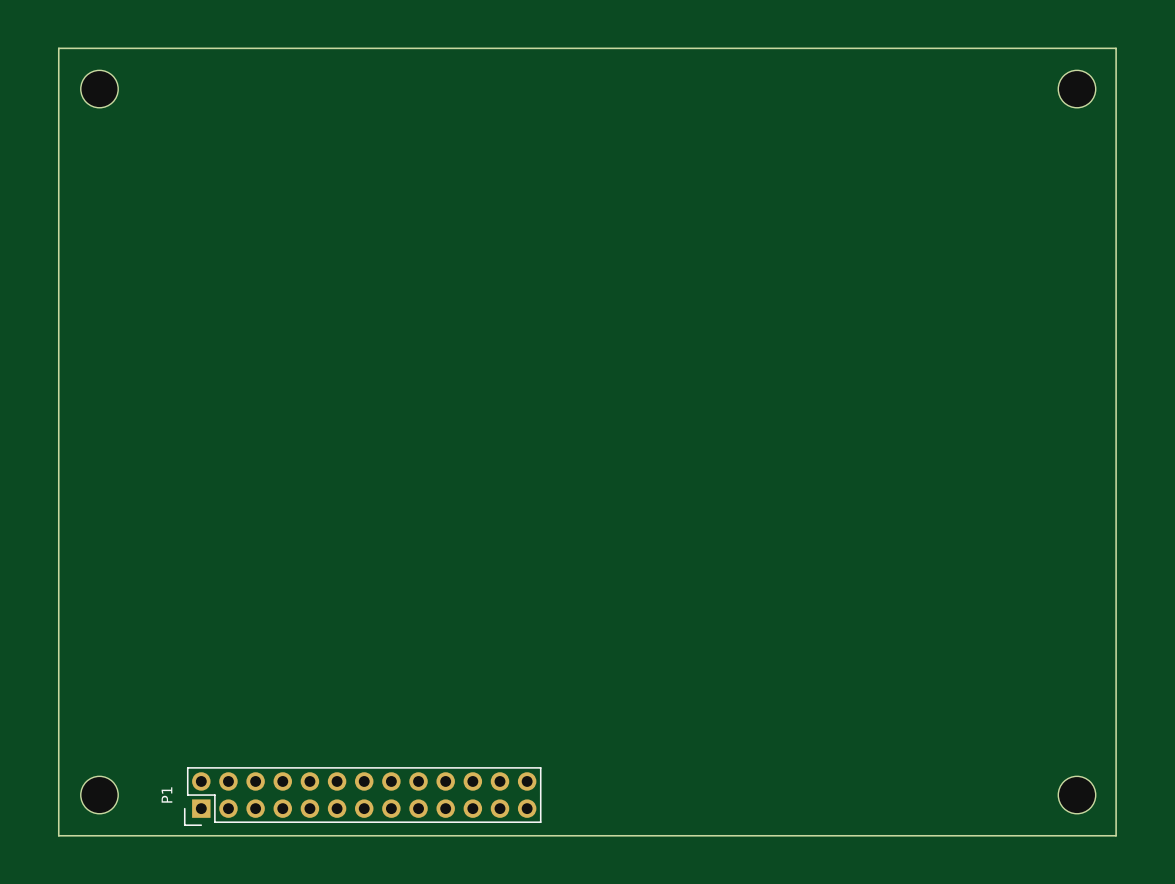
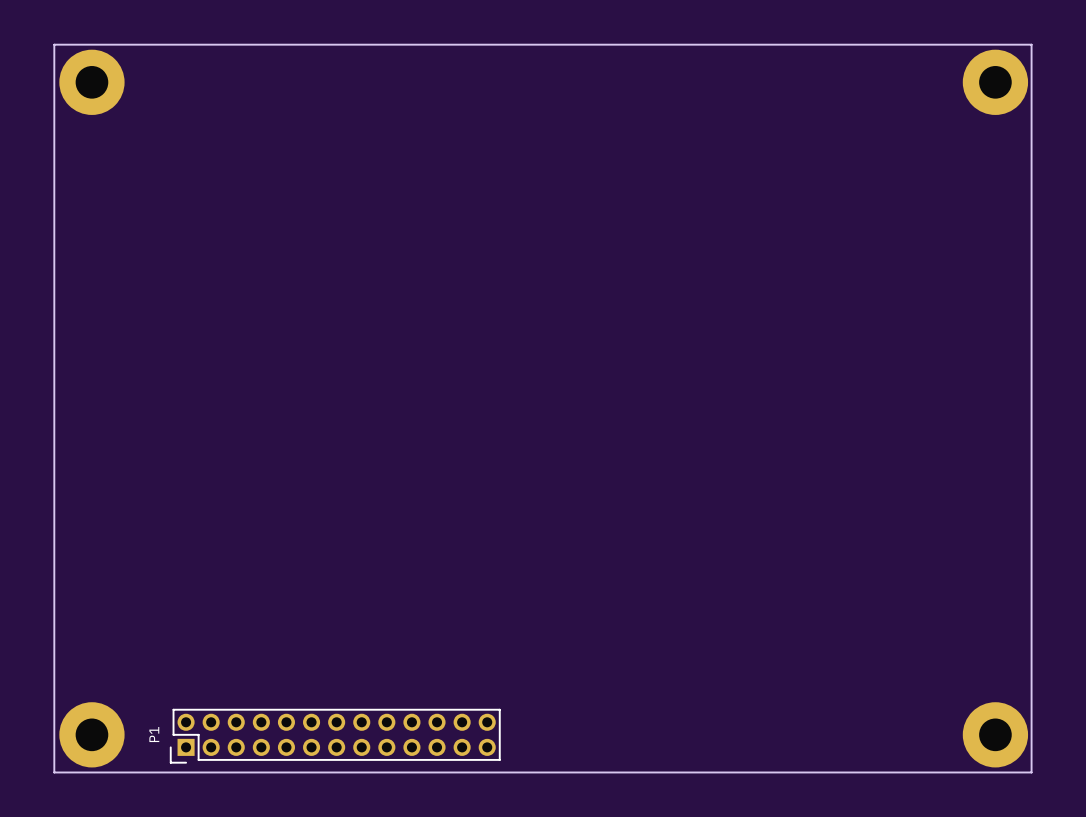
part footprint: [80, 70, 119, 108] -> [59, 49, 125, 115]
part footprint: [1058, 70, 1096, 108] -> [962, 49, 1029, 115]
part footprint: [80, 776, 119, 814] -> [59, 702, 125, 768]
part footprint: [1058, 776, 1096, 814] -> [962, 702, 1029, 768]

